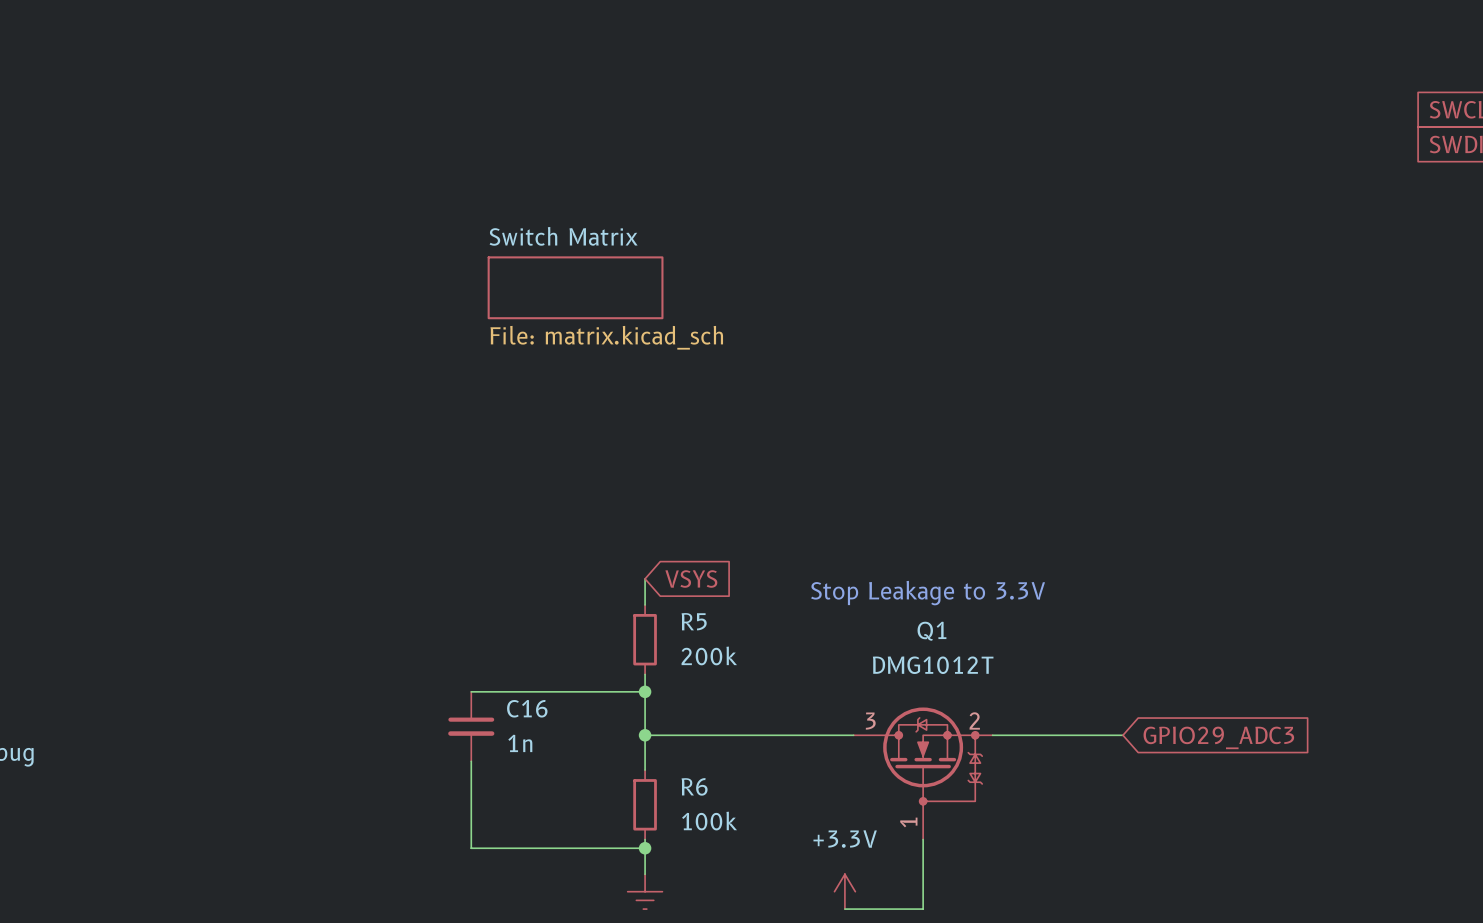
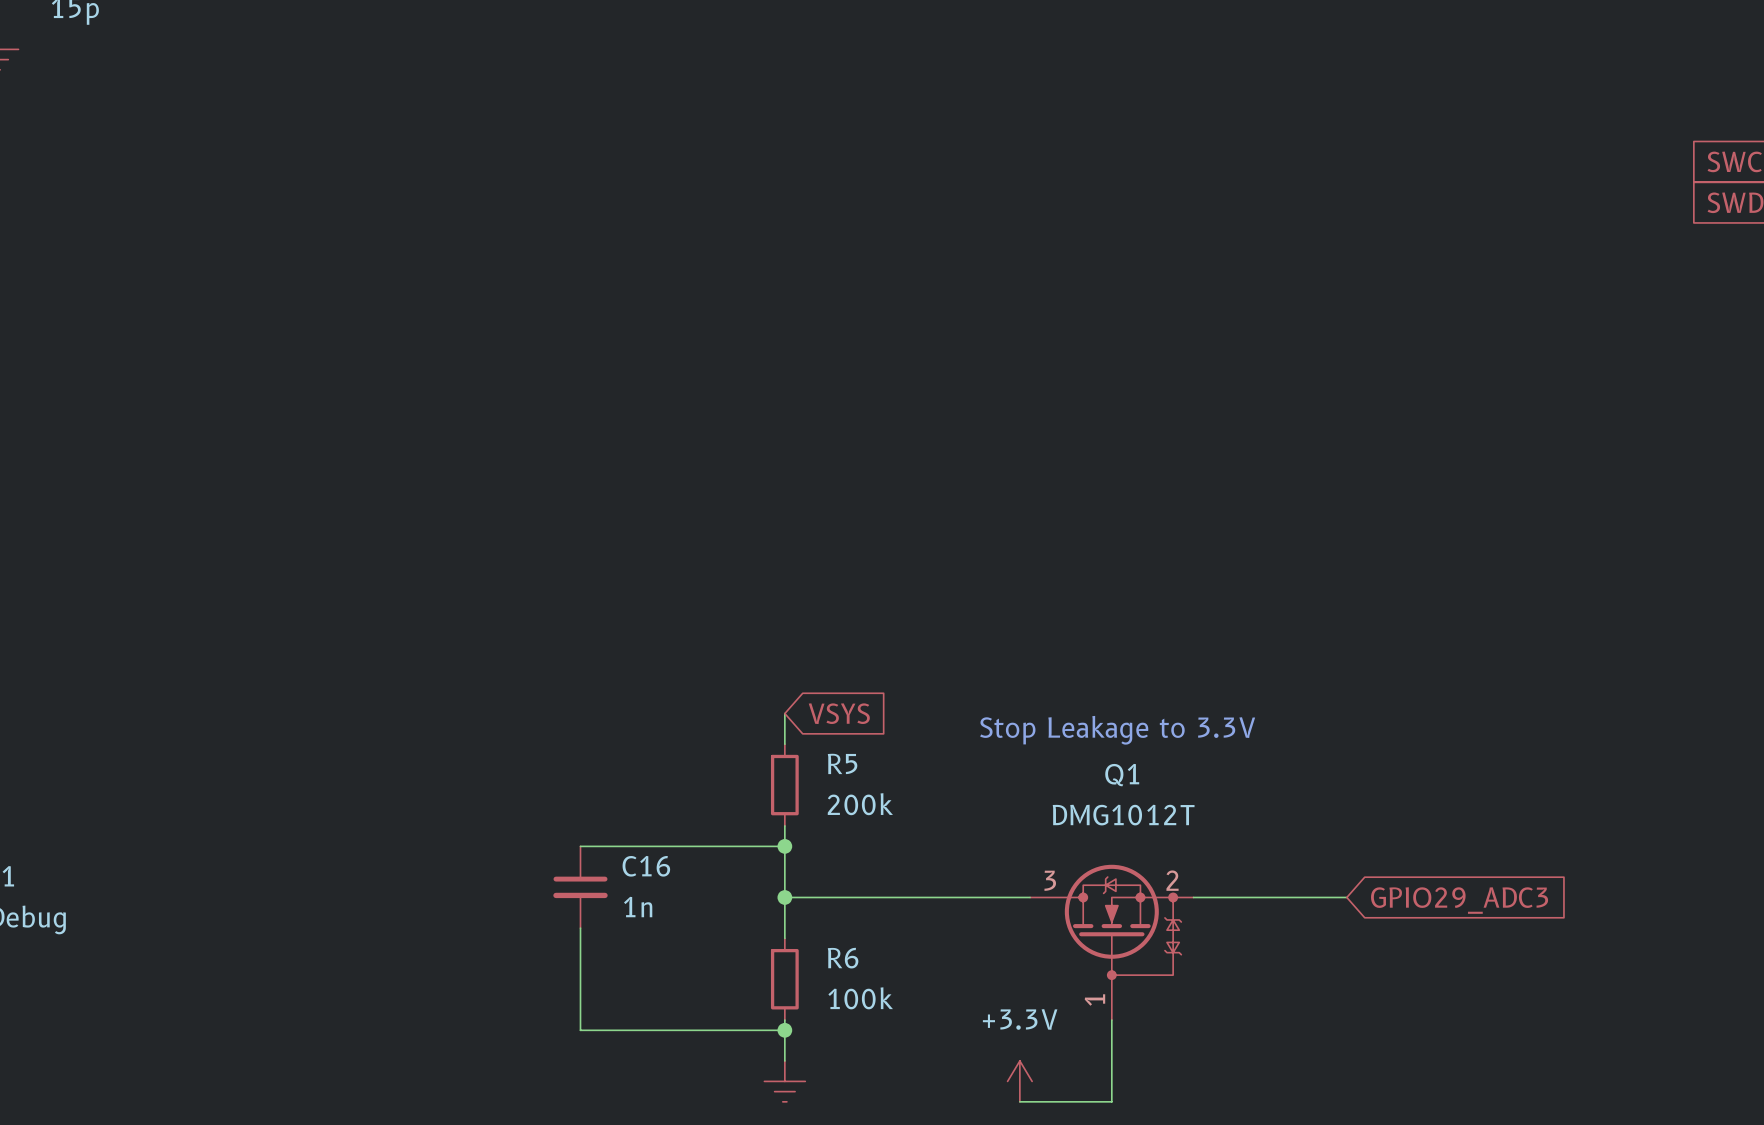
sheet Switch Matrix: File: matrix.kicad_sch (575, 287) -> none

